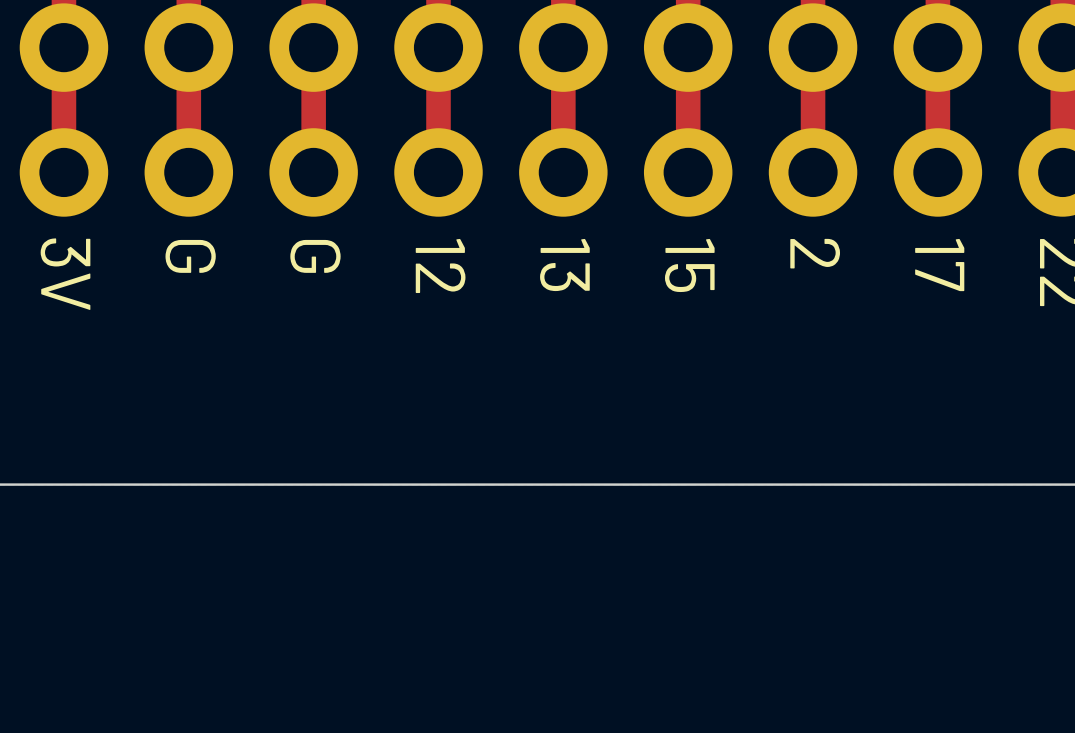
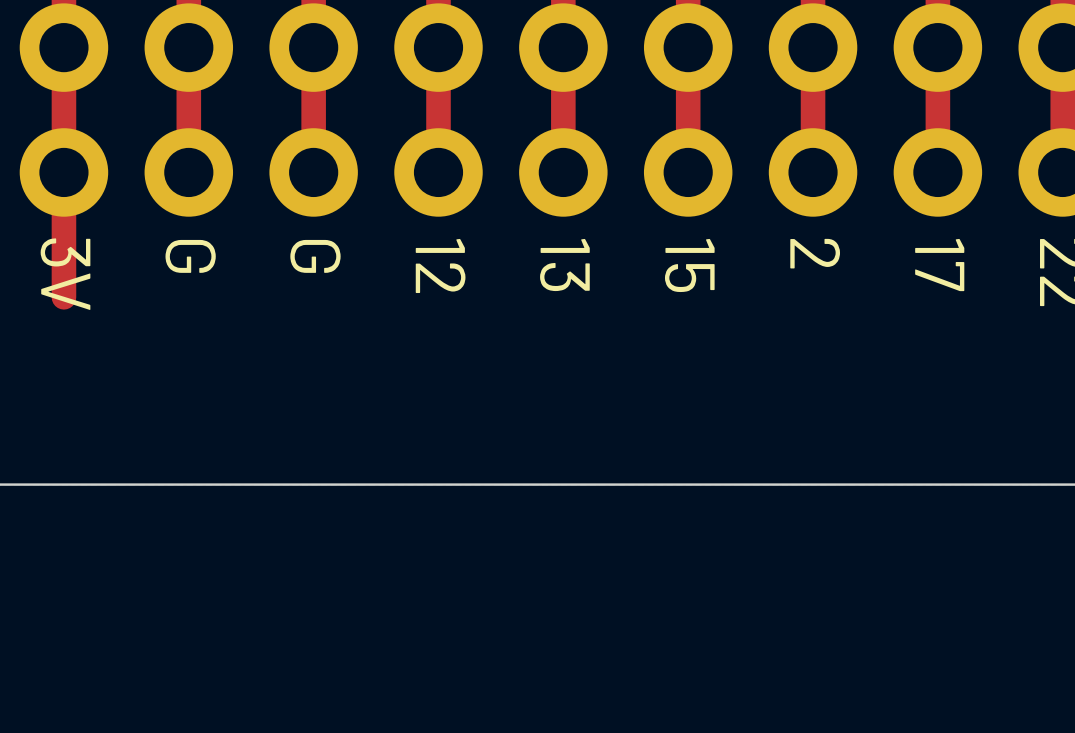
top track: none -> (63, 172) (63, 297)

